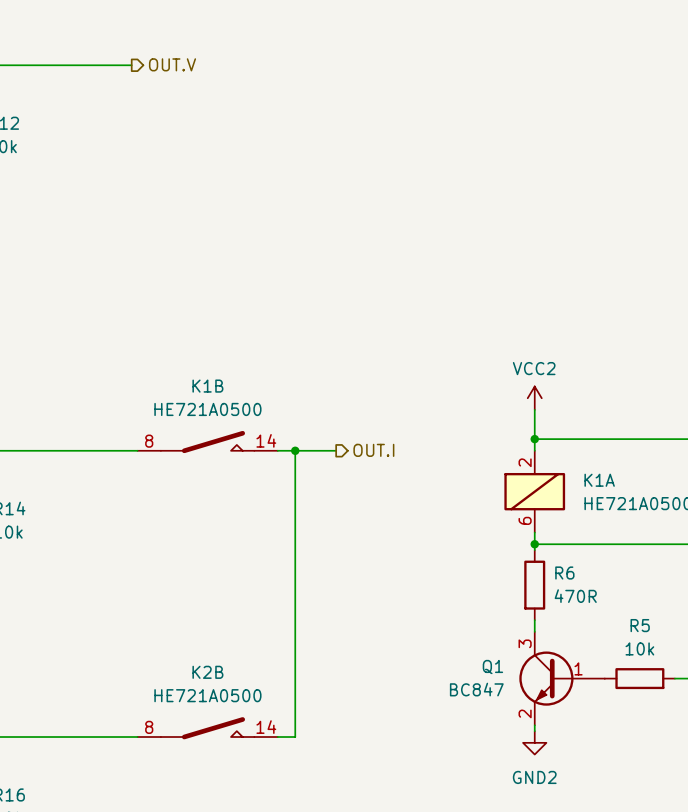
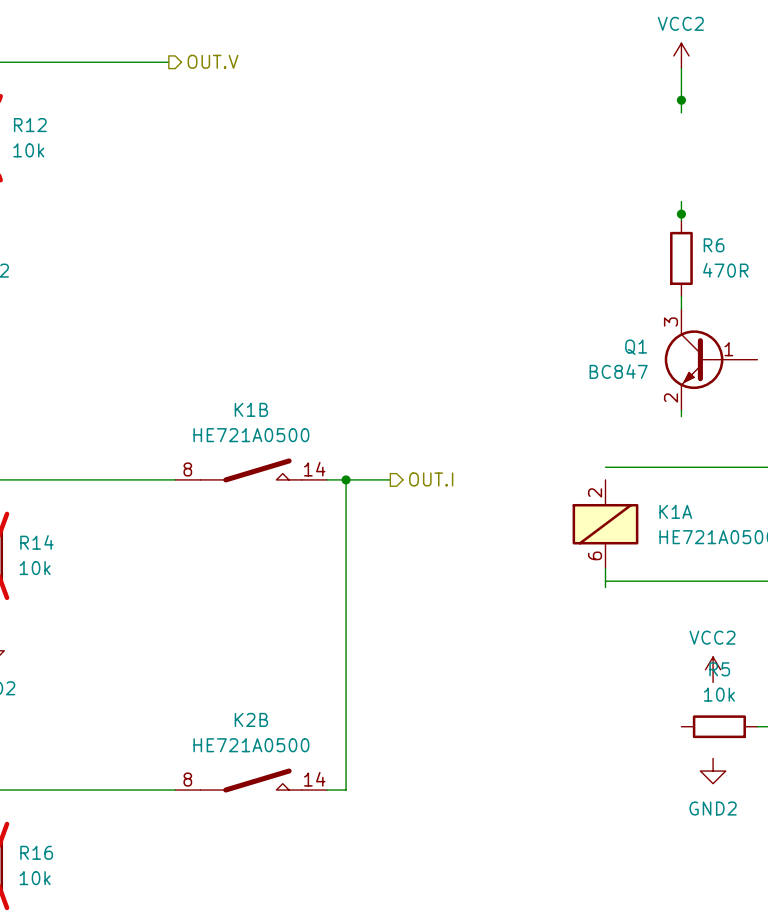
power symbol: none -> VCC2 (681, 55)
wire: none -> (681, 68) (681, 112)
junction: none -> (681, 100)
wire: none -> (681, 201) (681, 220)
junction: none -> (681, 214)
wire: none -> (681, 296) (681, 309)
wire: none -> (681, 410) (681, 416)
power symbol: VCC2 (534, 398) -> none
wire: (534, 409) (534, 450) -> none
junction: (534, 439) -> none
junction: (534, 544) -> none
R6 position: (534, 585) -> (681, 258)
wire: (534, 620) (534, 631) -> none
power symbol: none -> VCC2 (713, 669)
Q1 position: (562, 678) -> (711, 359)
wire: (534, 725) (534, 731) -> none
power symbol position: GND2 (534, 742) -> GND2 (713, 771)

